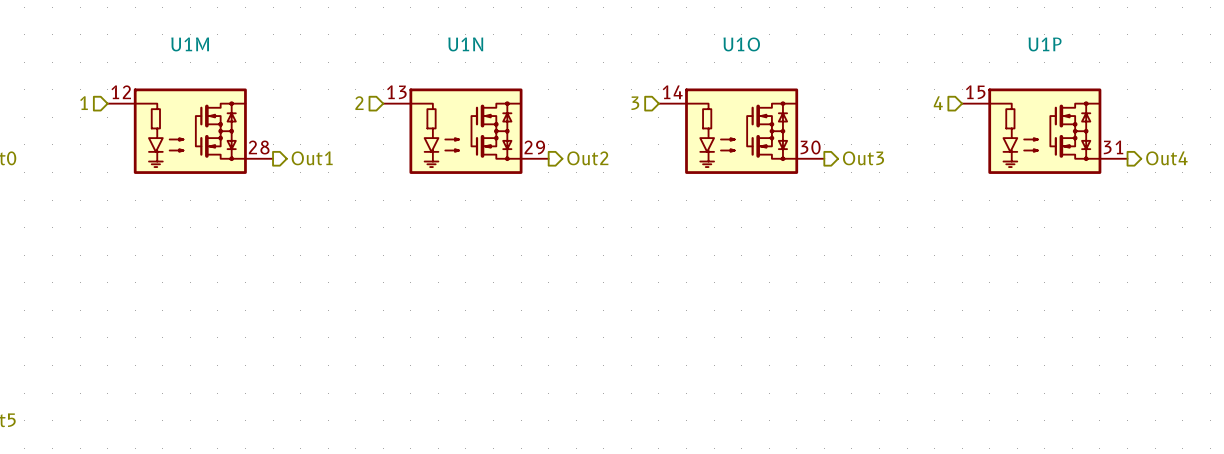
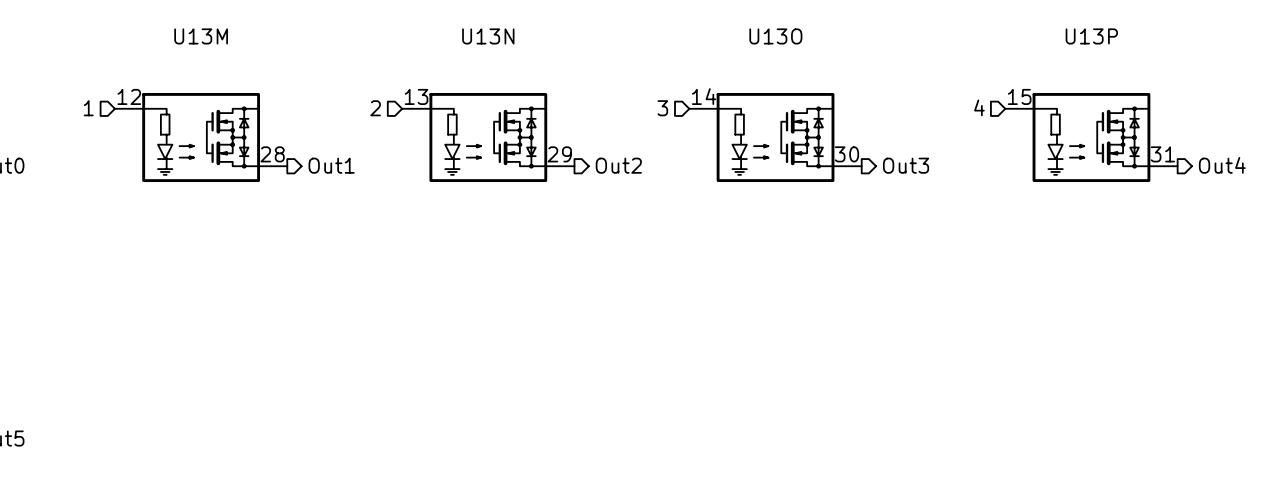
U1M name: U1M (190, 44) -> U13M (201, 36)
U1N name: U1N (465, 44) -> U13N (488, 36)
U1O name: U1O (741, 44) -> U13O (775, 36)
U1P name: U1P (1045, 44) -> U13P (1091, 36)

